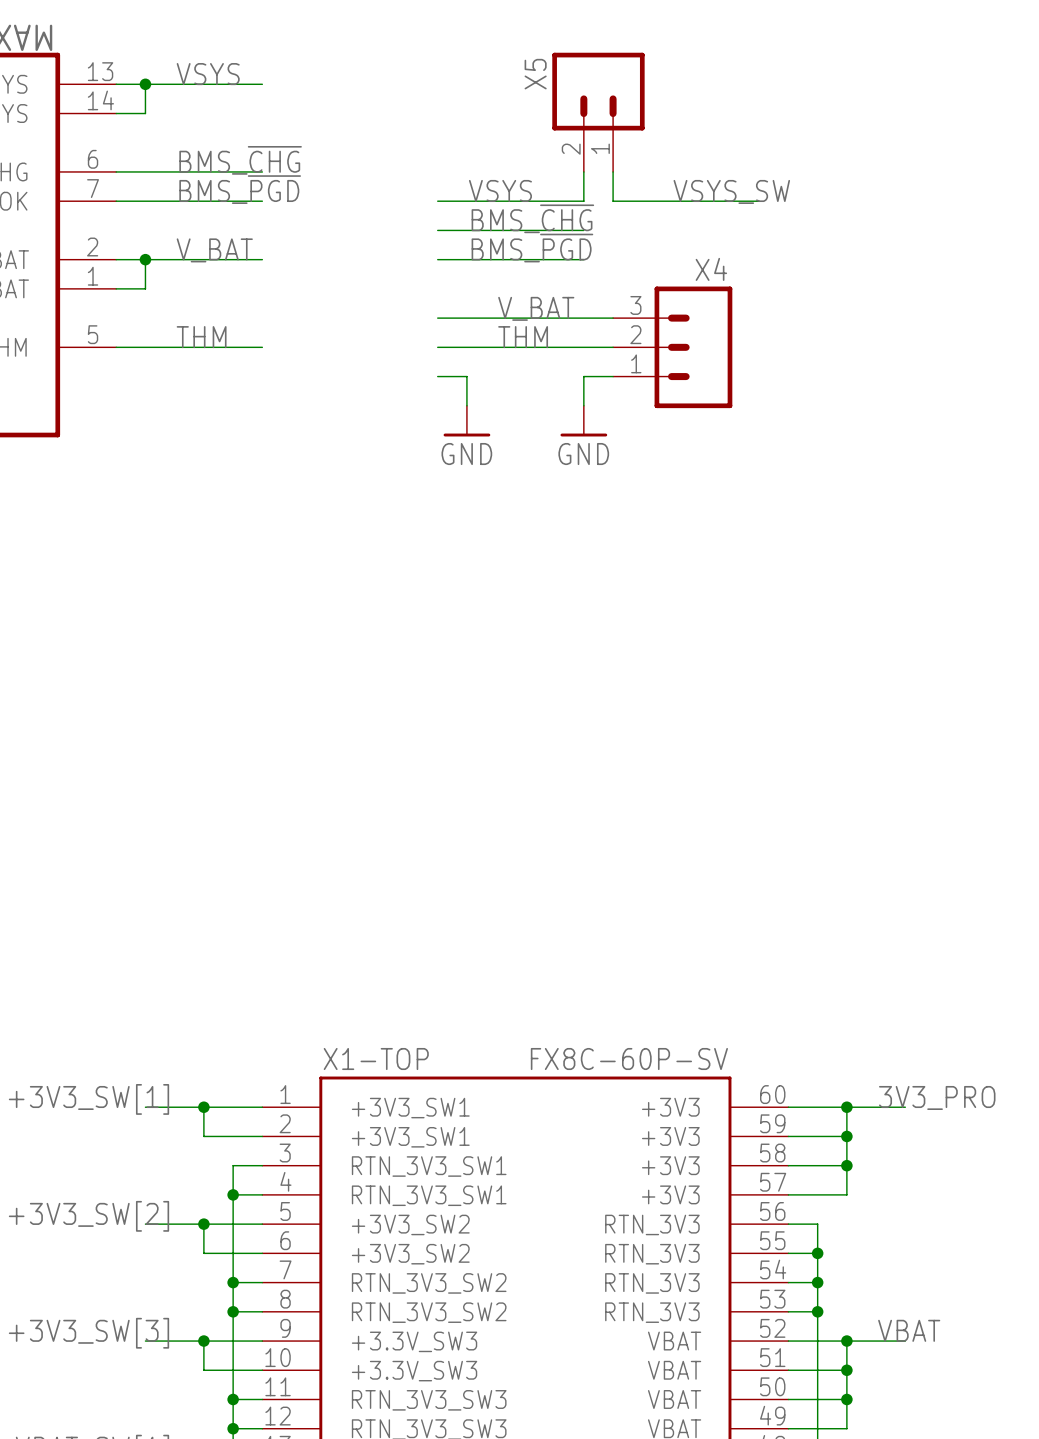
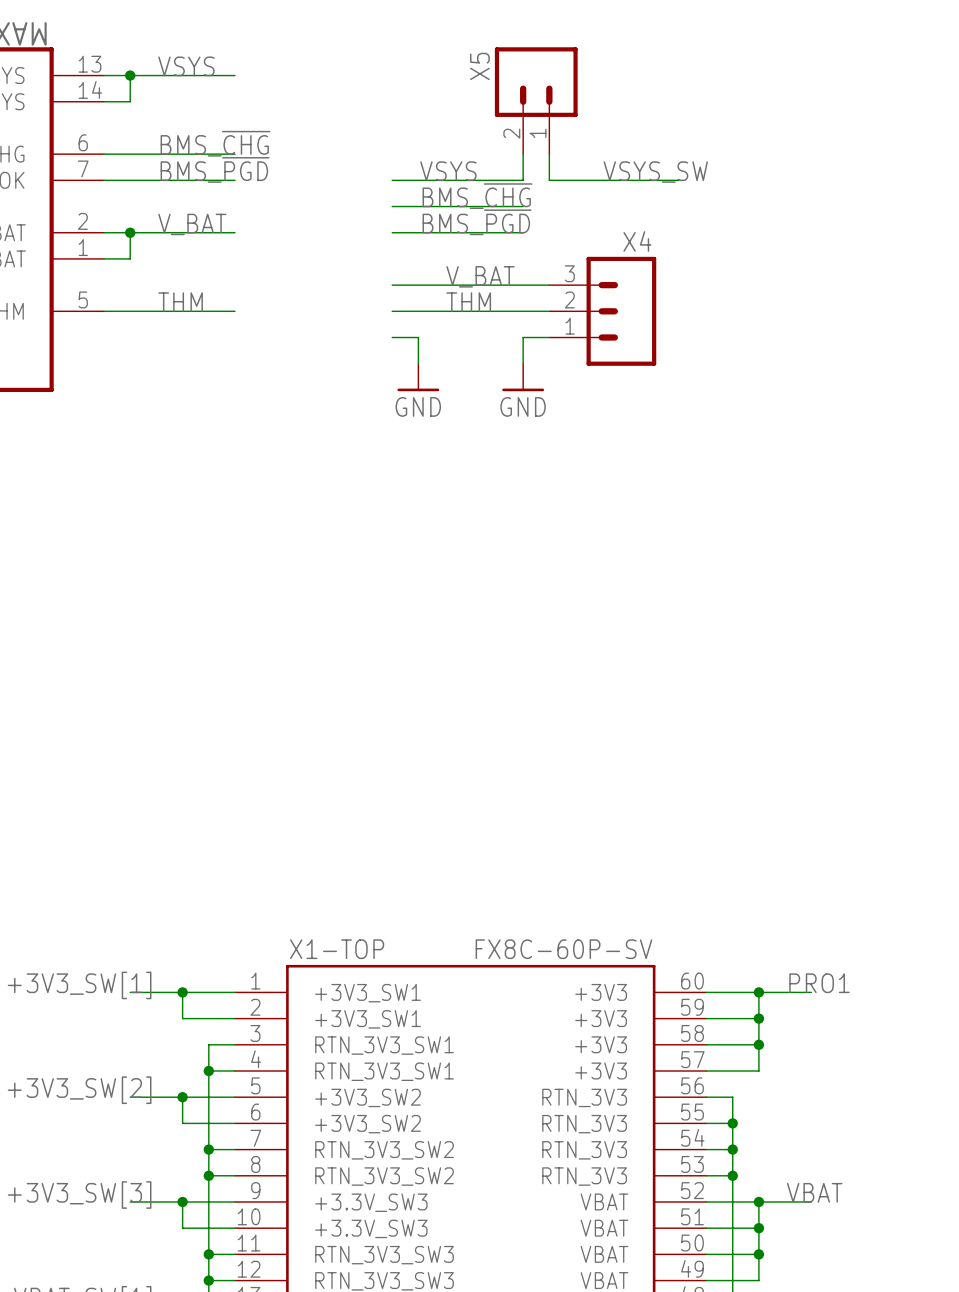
label: 3V3_PRO (937, 1097) -> PRO1 (819, 983)

